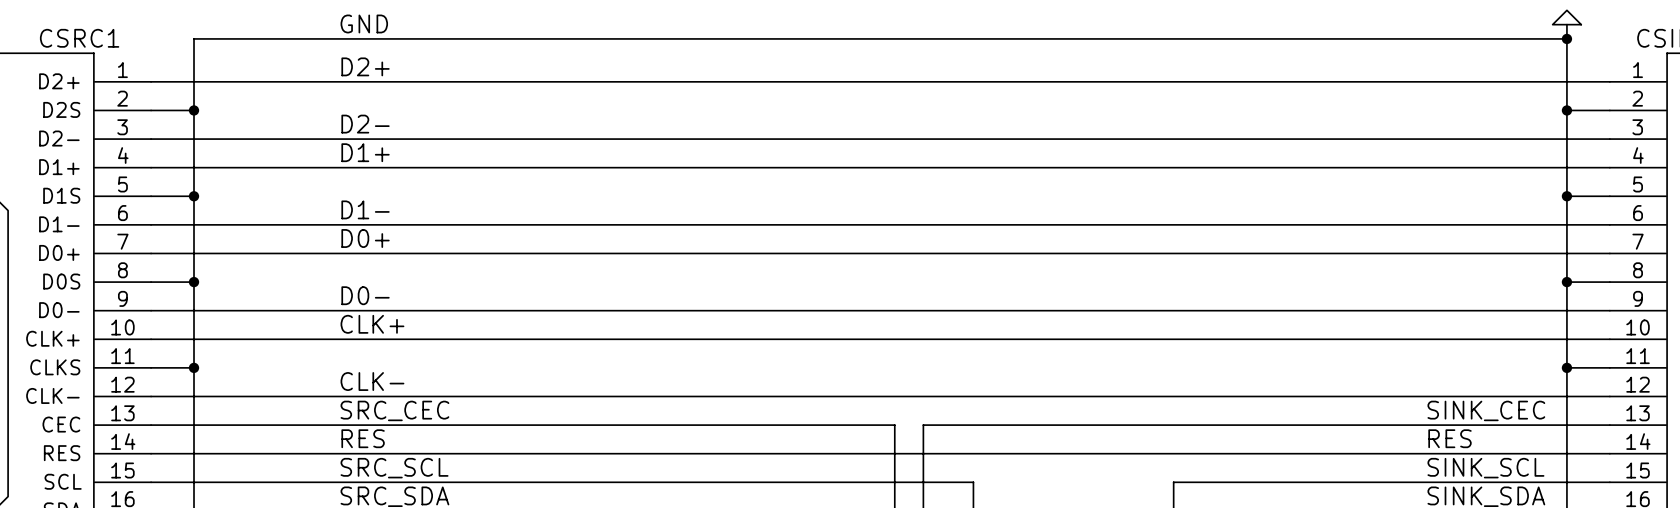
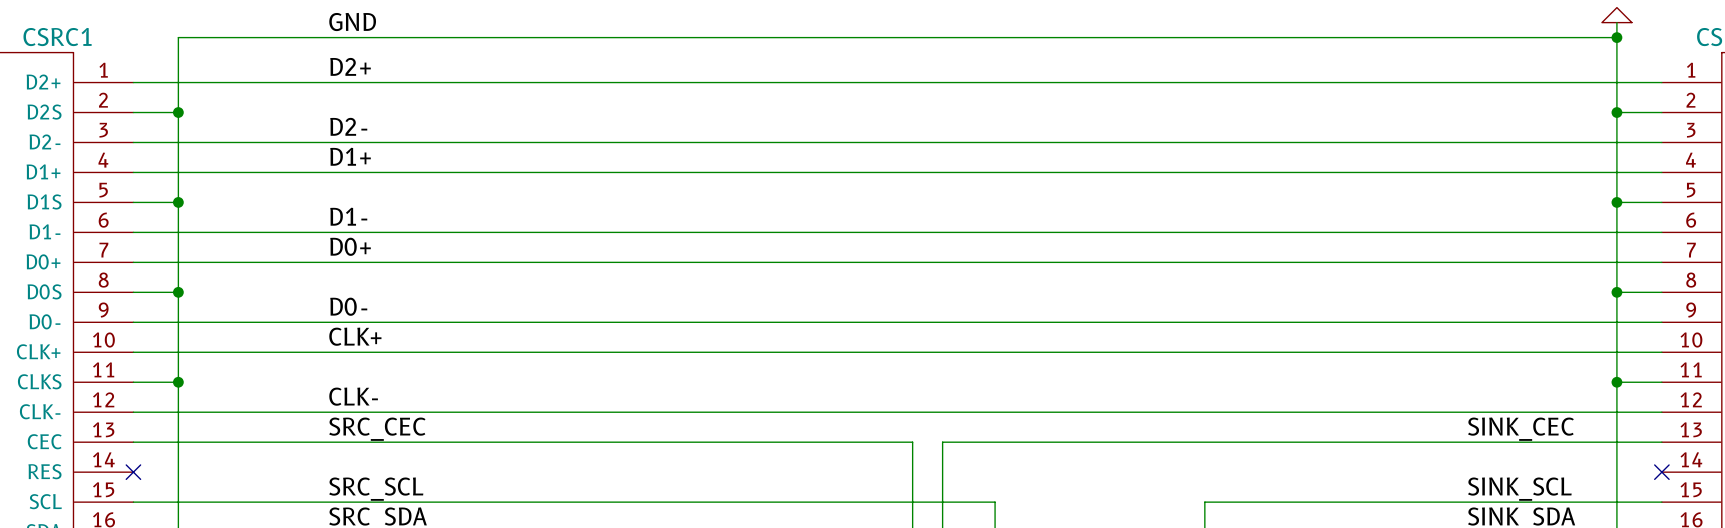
label: RES (363, 438) -> none
label: RES (1449, 438) -> none
wire: (151, 453) (1609, 453) -> none
no-connect mark: none -> (133, 472)
no-connect mark: none -> (1661, 472)

